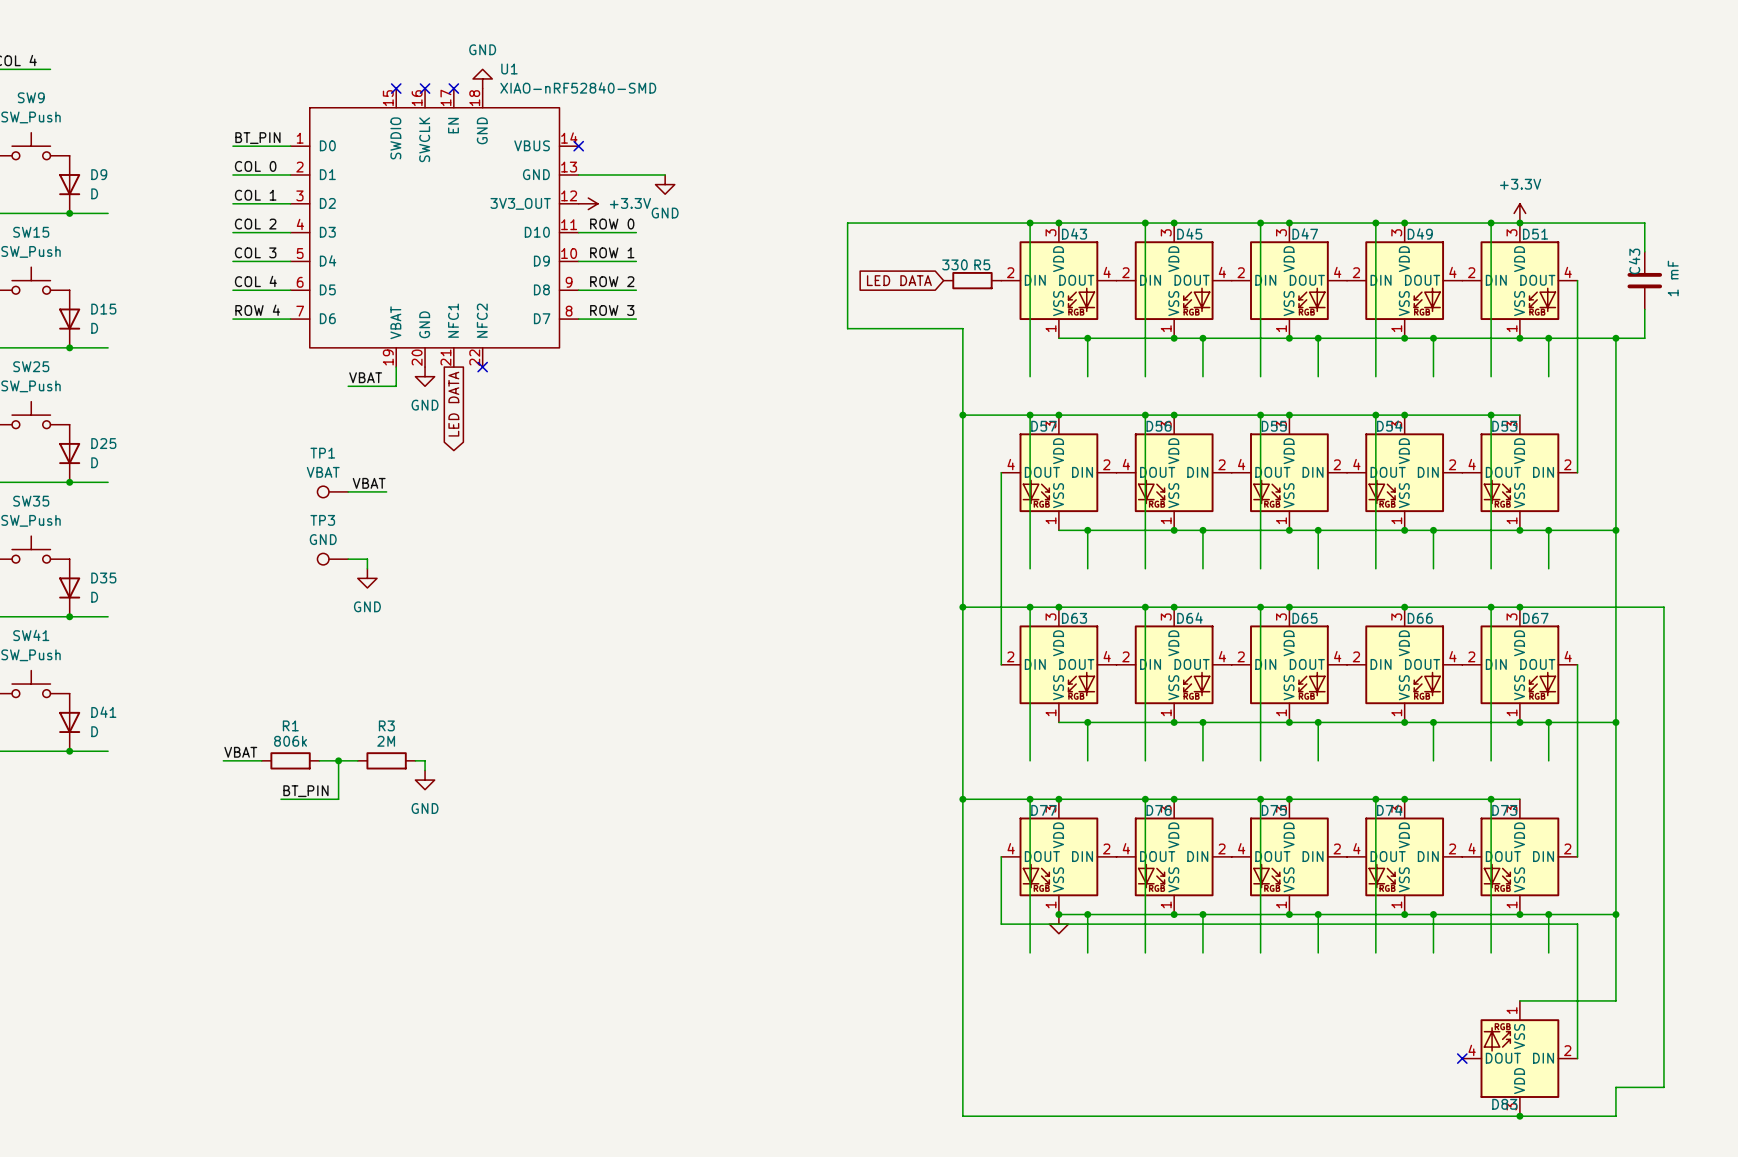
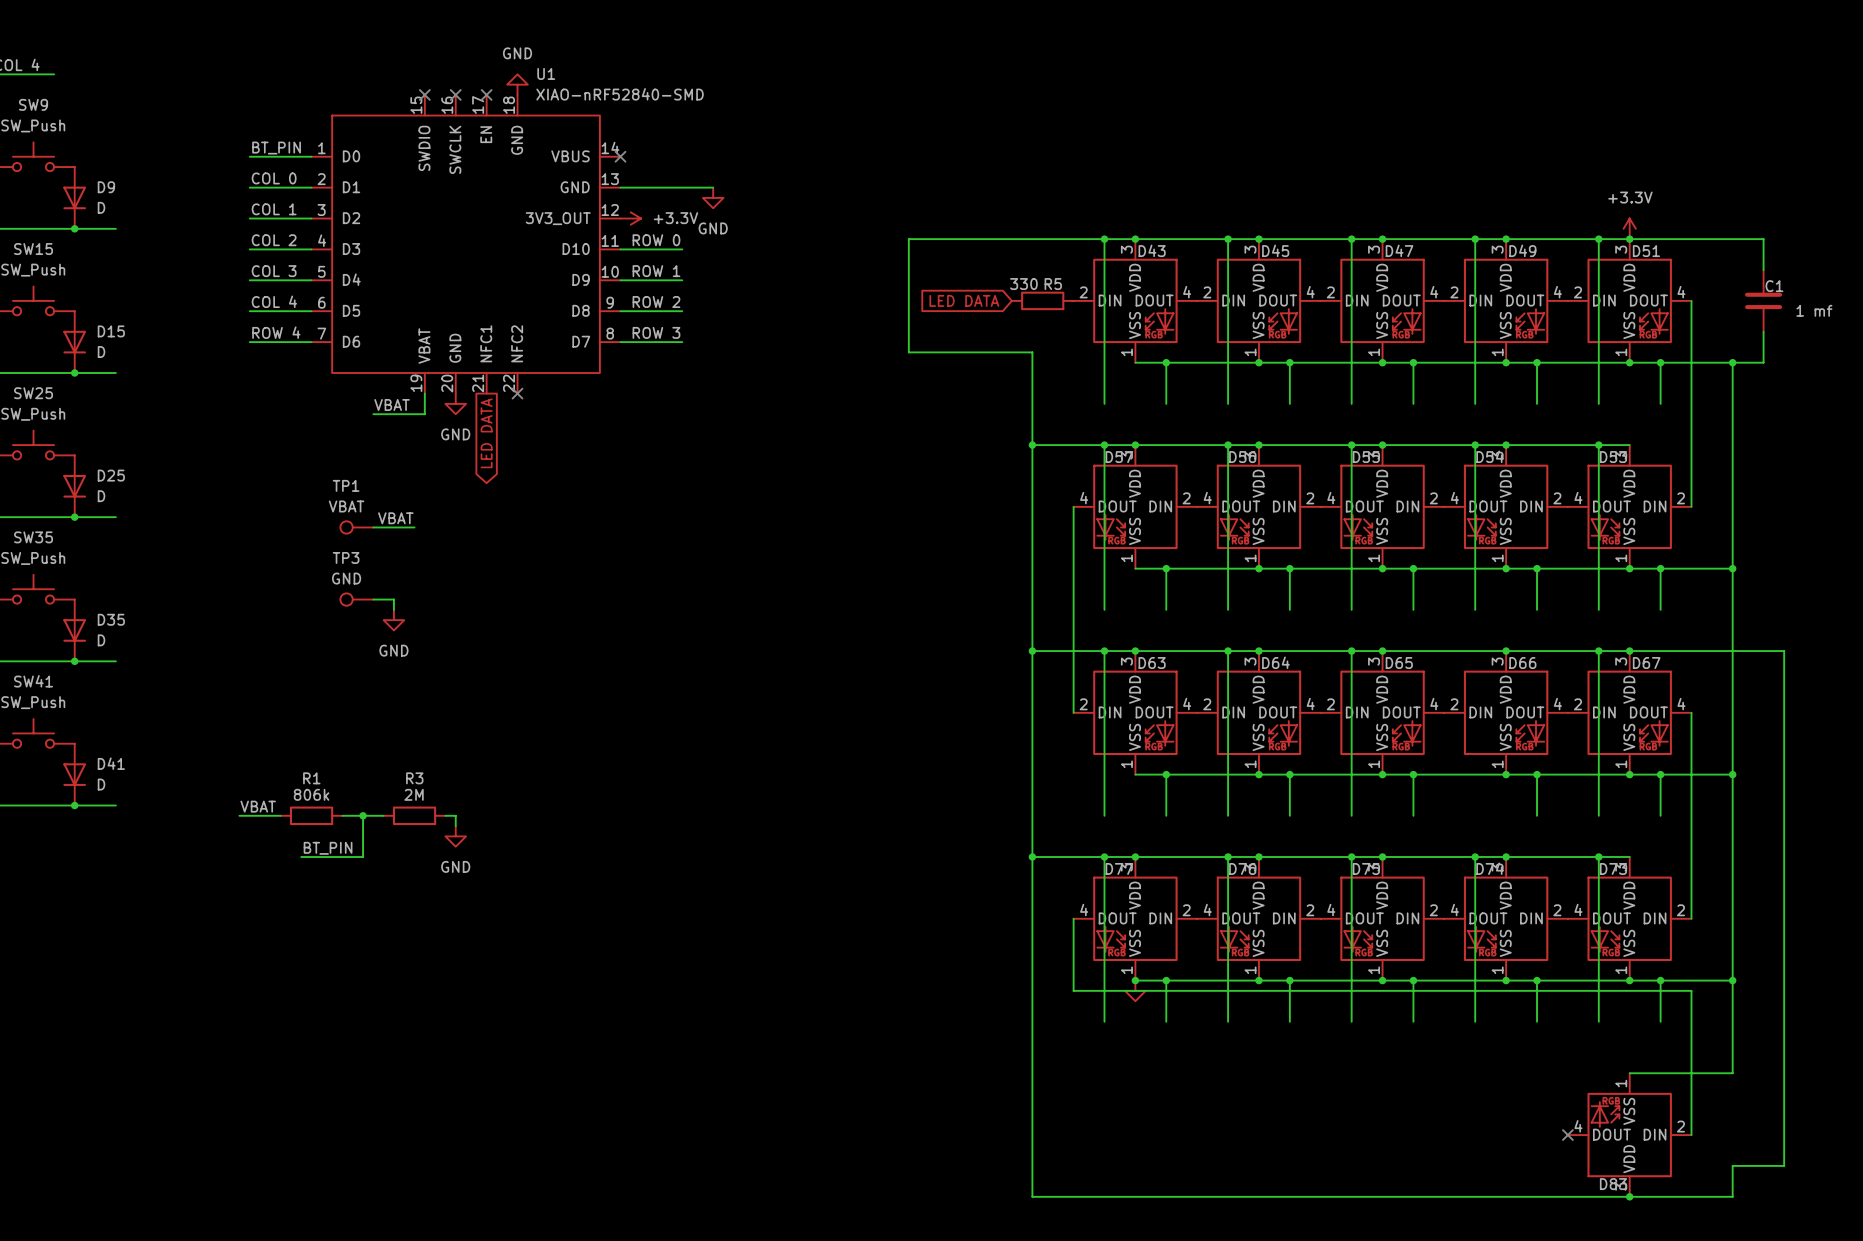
C43 name: C43 (1634, 261) -> C1 (1774, 286)
C43 value: 1 mF (1673, 278) -> 1 mf (1814, 310)

